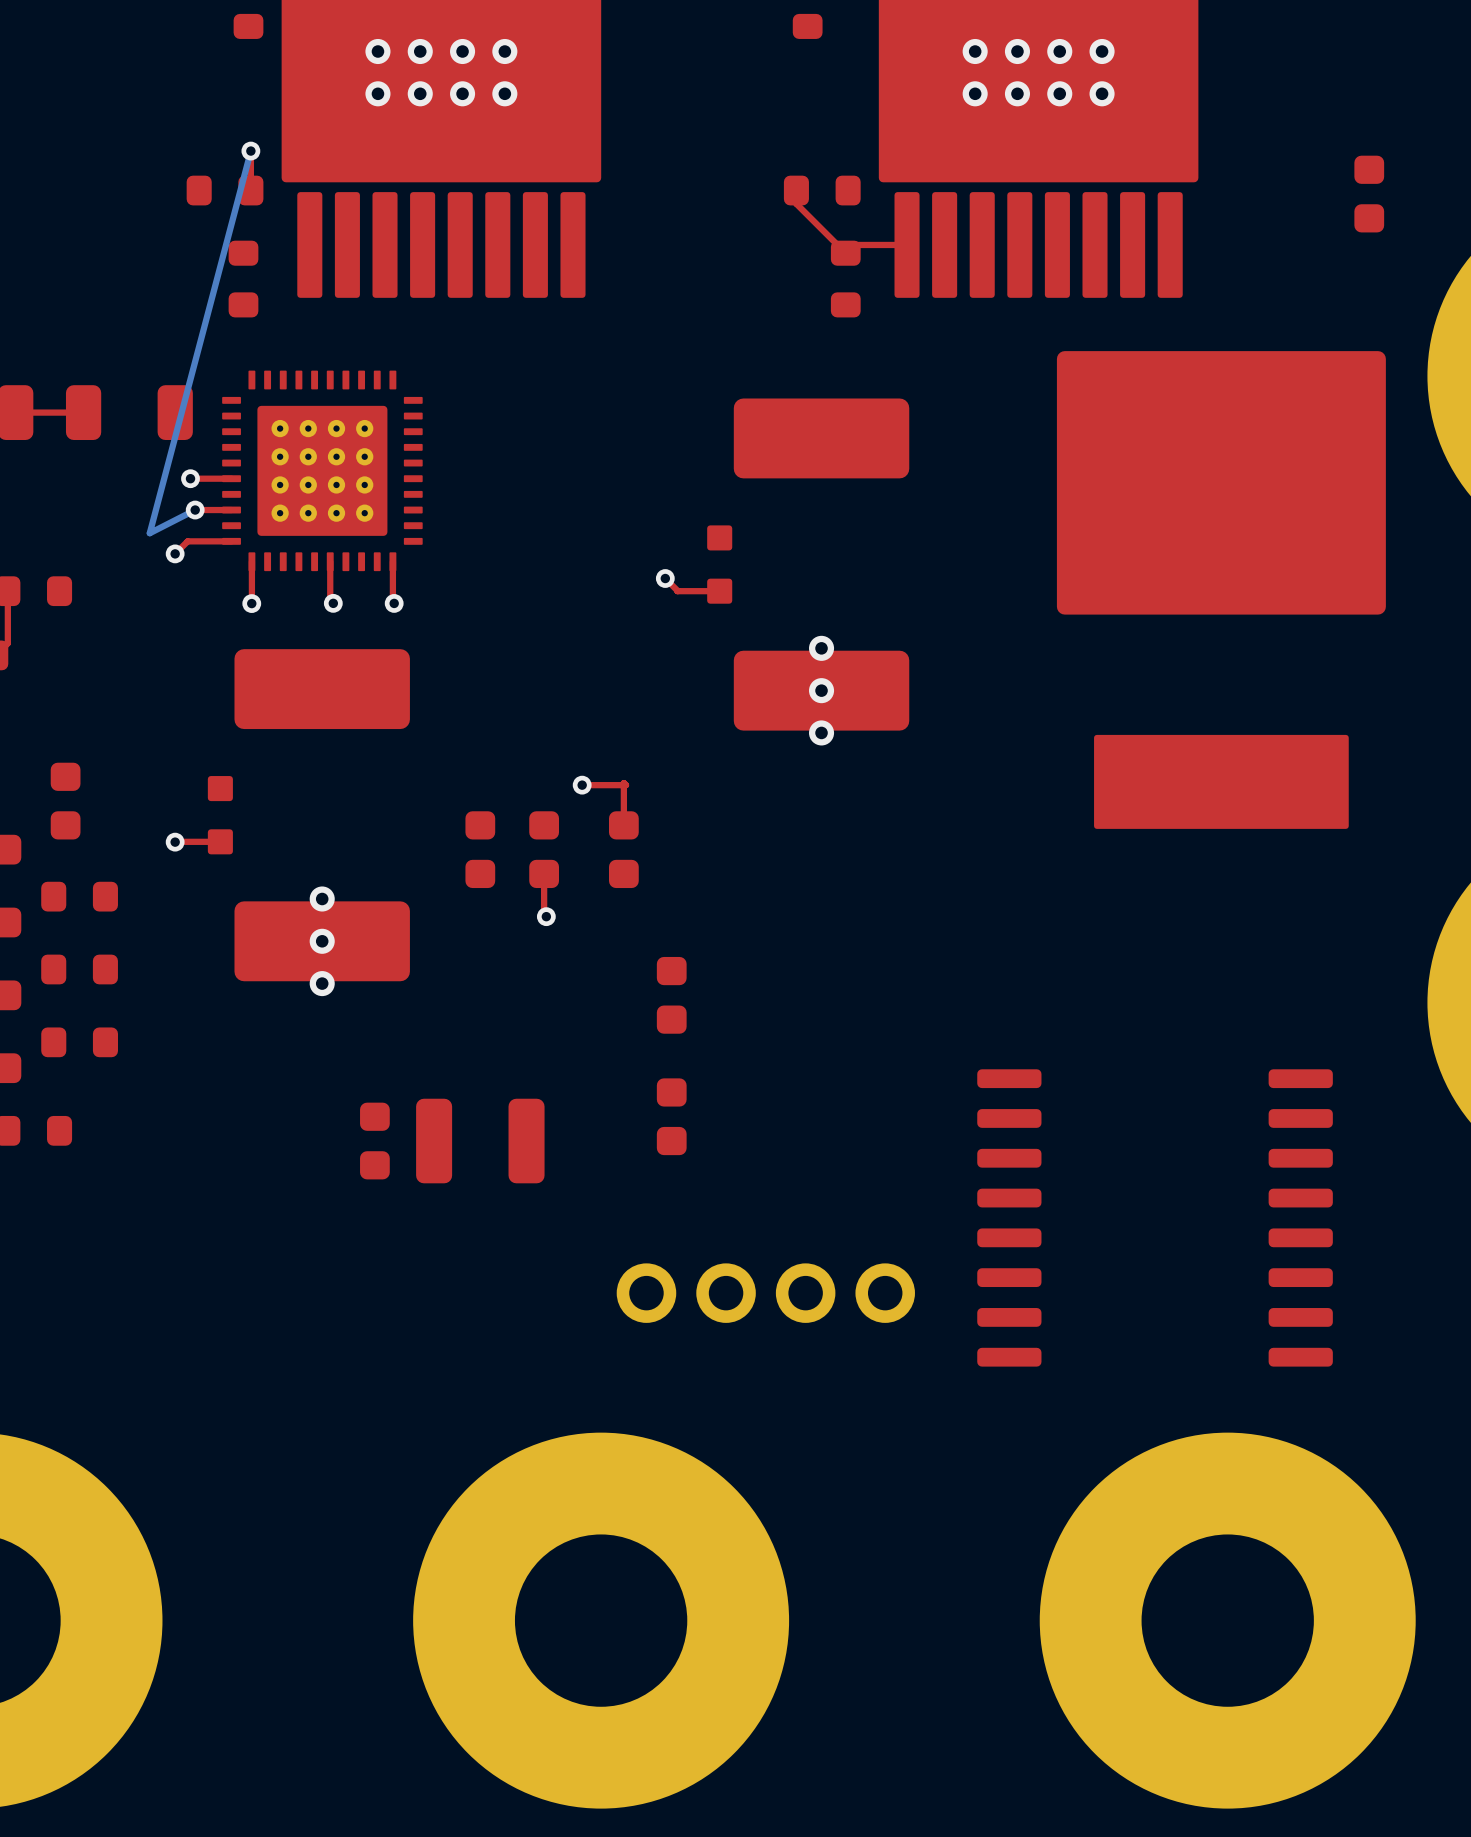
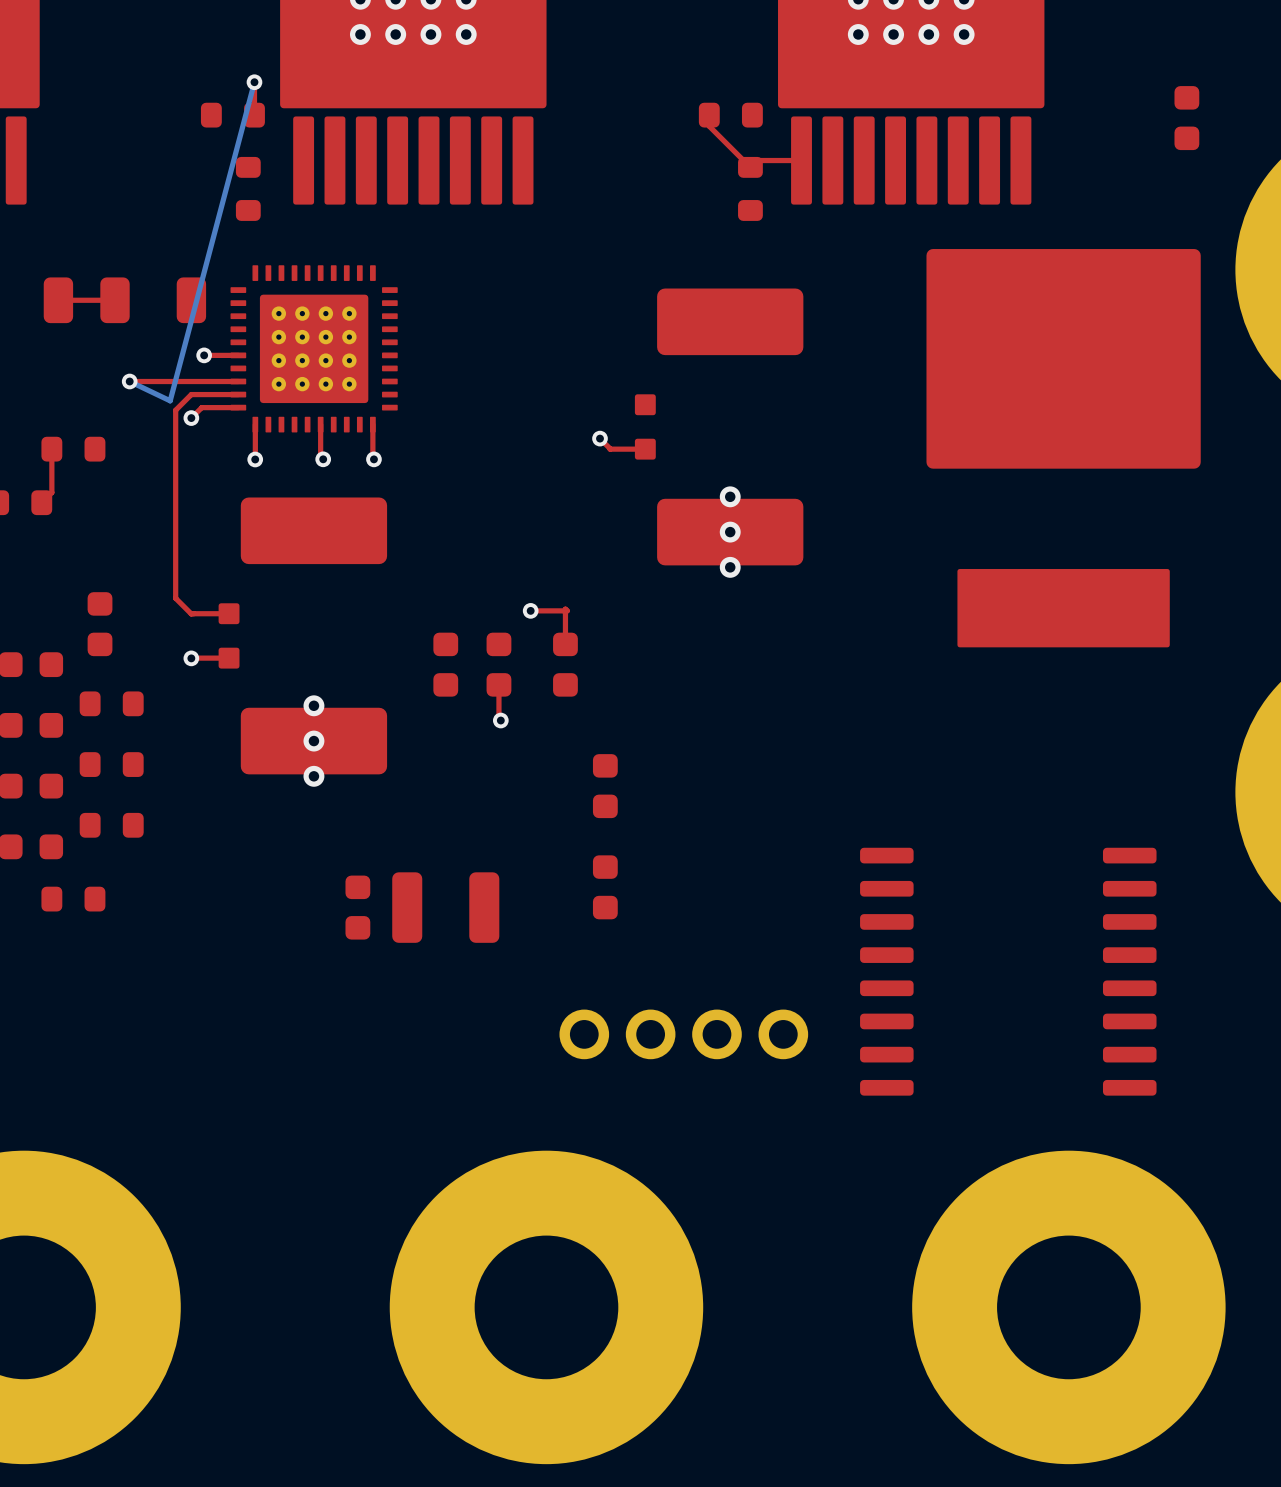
top track: none -> (208, 381) (129, 381)
bottom track: (195, 510) (149, 533) -> (129, 381) (170, 400)
via position: (195, 510) -> (129, 381)
top track: none -> (238, 394) (191, 394) (175, 410) (175, 598) (191, 613) (229, 613)

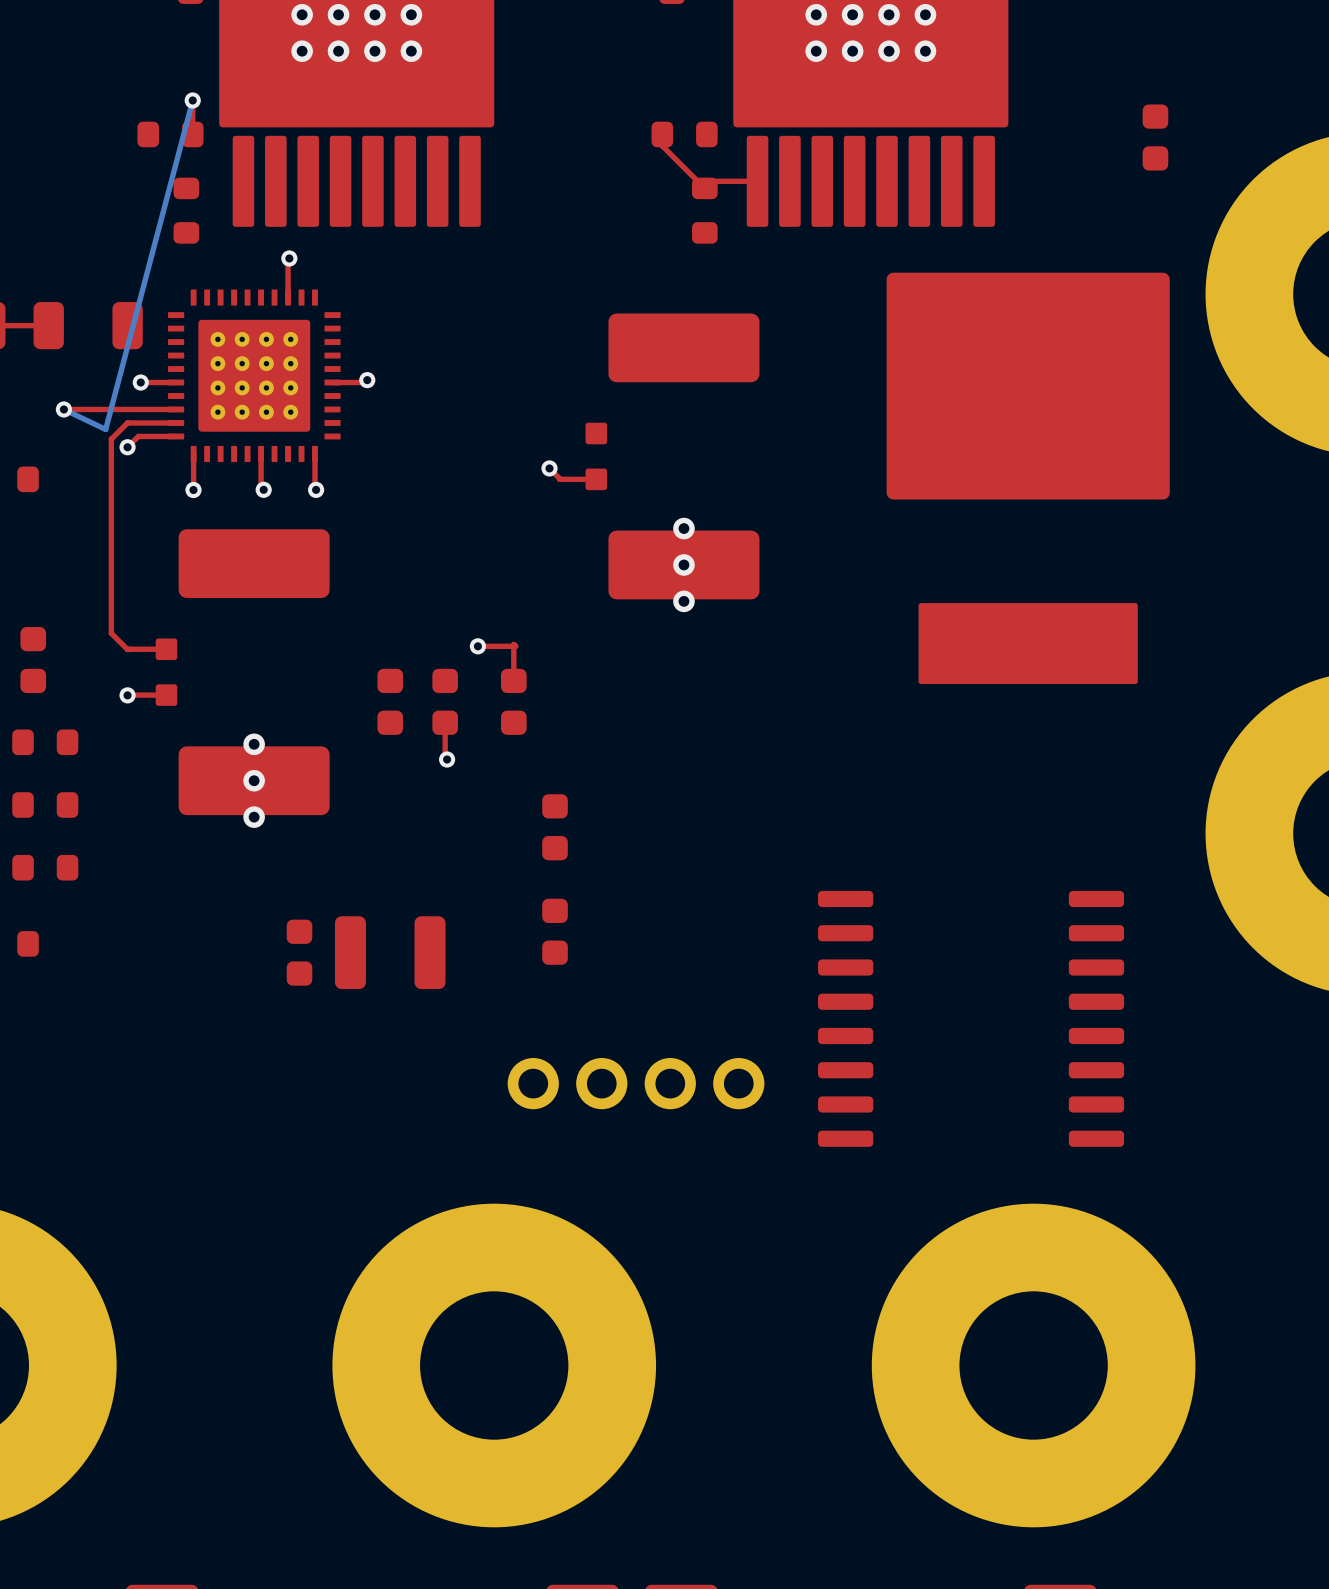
top track: none -> (289, 258) (288, 297)
via: none -> (289, 258)
top track: none -> (367, 380) (368, 382) (332, 382)
via: none -> (367, 380)

